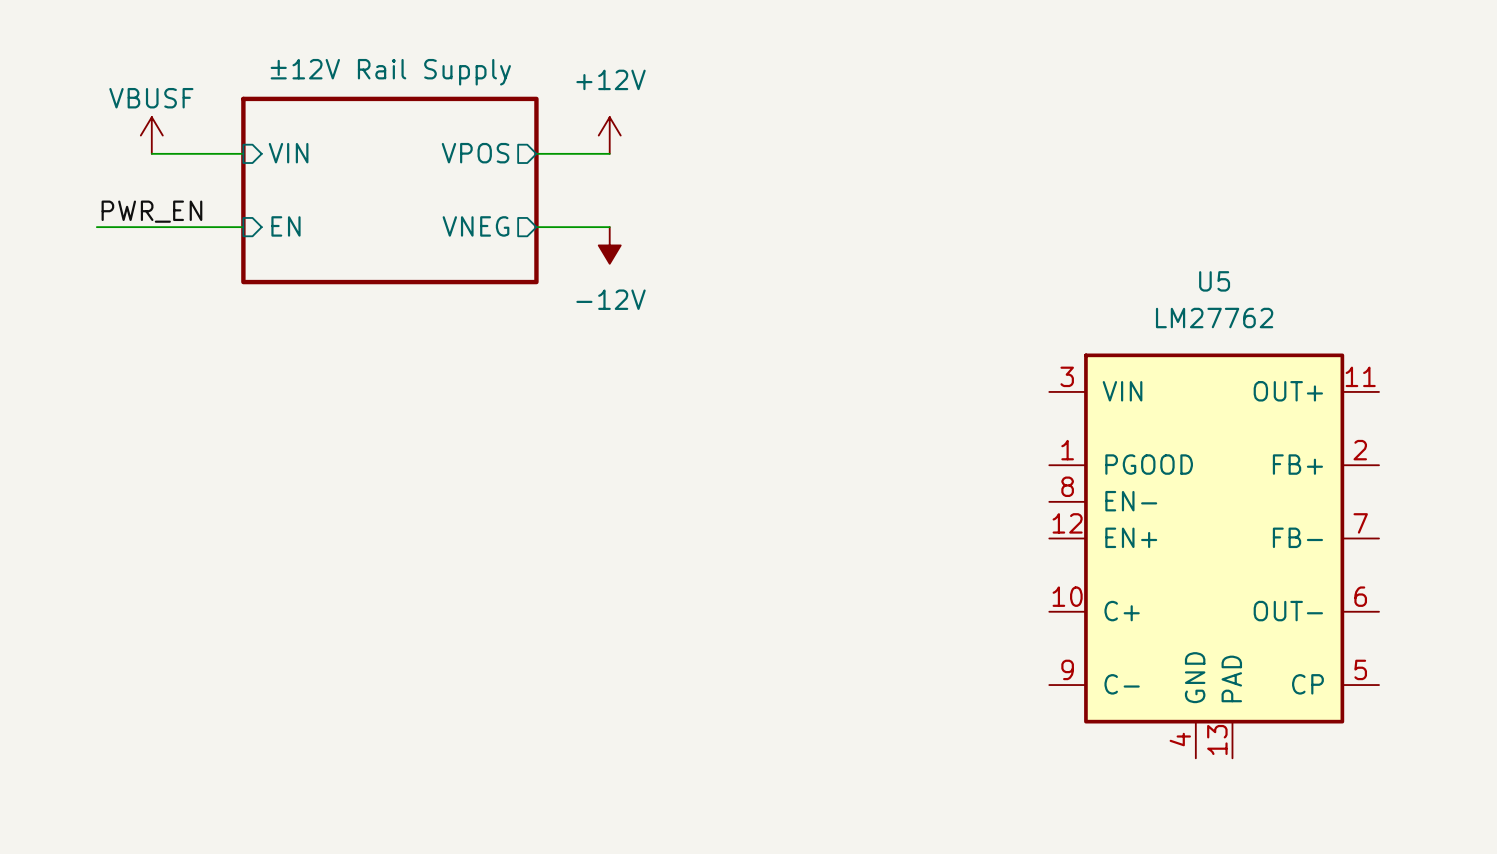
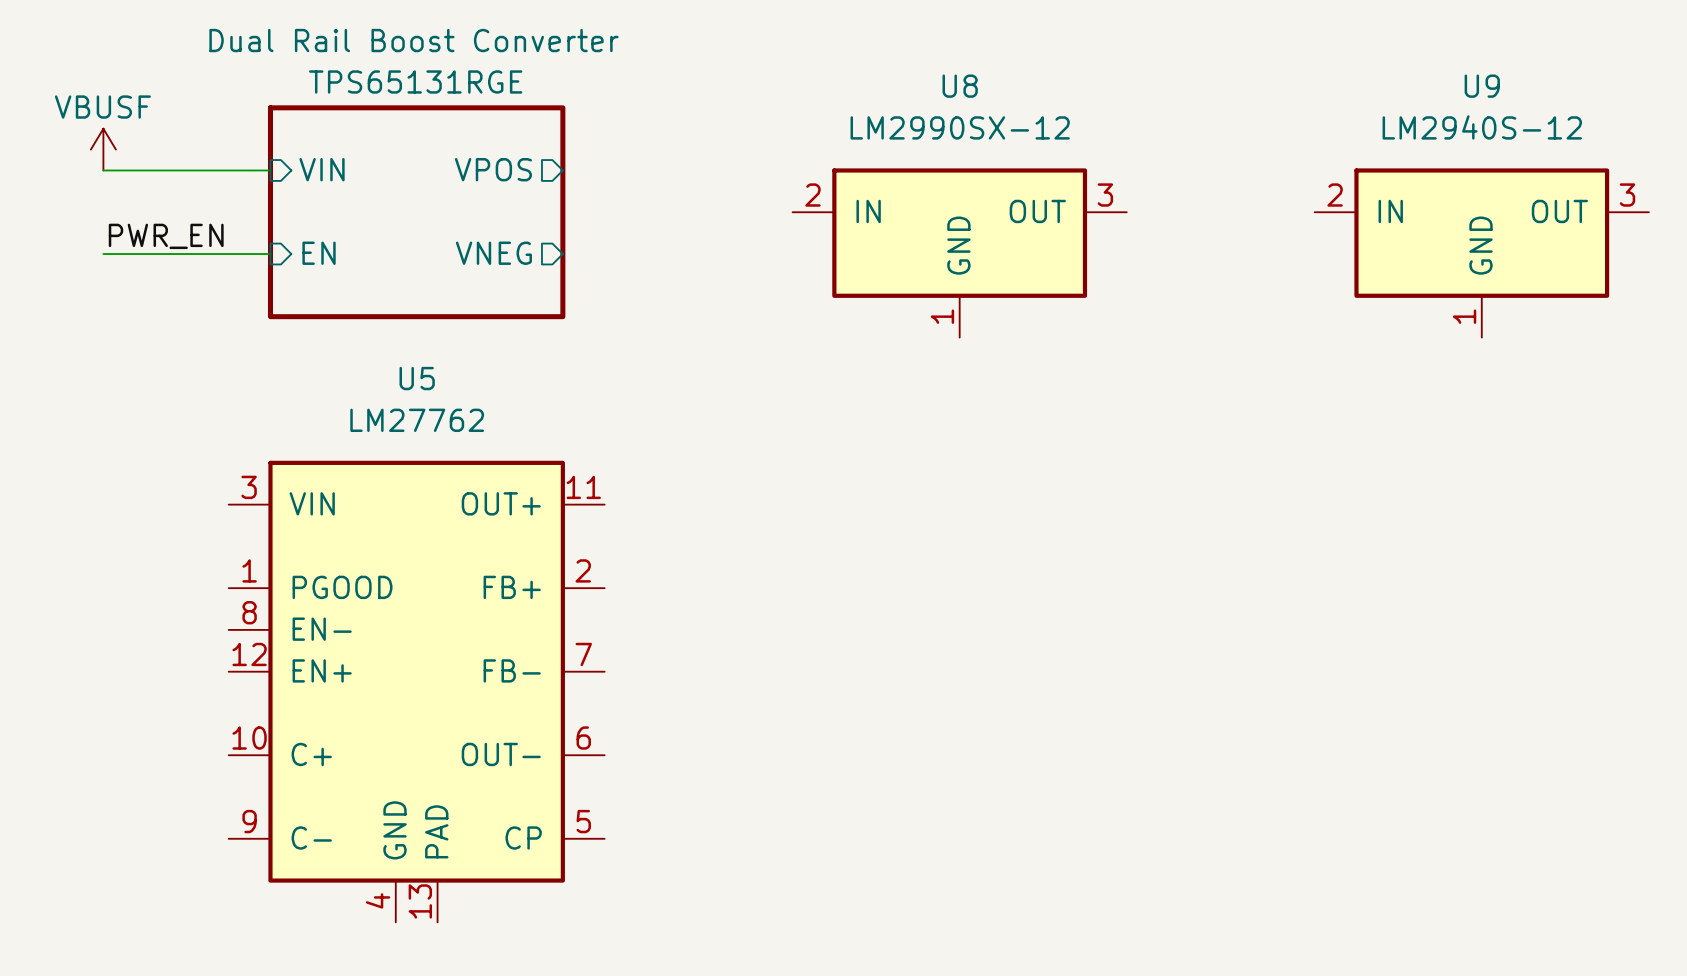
power symbol position: VBUSF (151, 135) -> VBUSF (103, 149)
power symbol: +12V (609, 135) -> none
wire: none -> (103, 170) (166, 170)
sheet pin position: VPOS (475, 153) -> VPOS (493, 169)
wire: (536, 153) (609, 153) -> none
sheet Dual Rail Boost Converter: none -> (416, 212)
sheet ±12V Rail Supply: (389, 190) -> none
sheet pin position: VNEG (475, 226) -> VNEG (493, 253)
U8: none -> LM2990SX-12 (959, 252)
U9: none -> LM2940S-12 (1481, 252)
wire: (536, 227) (609, 227) -> none
power symbol: -12V (609, 245) -> none
U5 position: (1214, 555) -> (416, 691)

